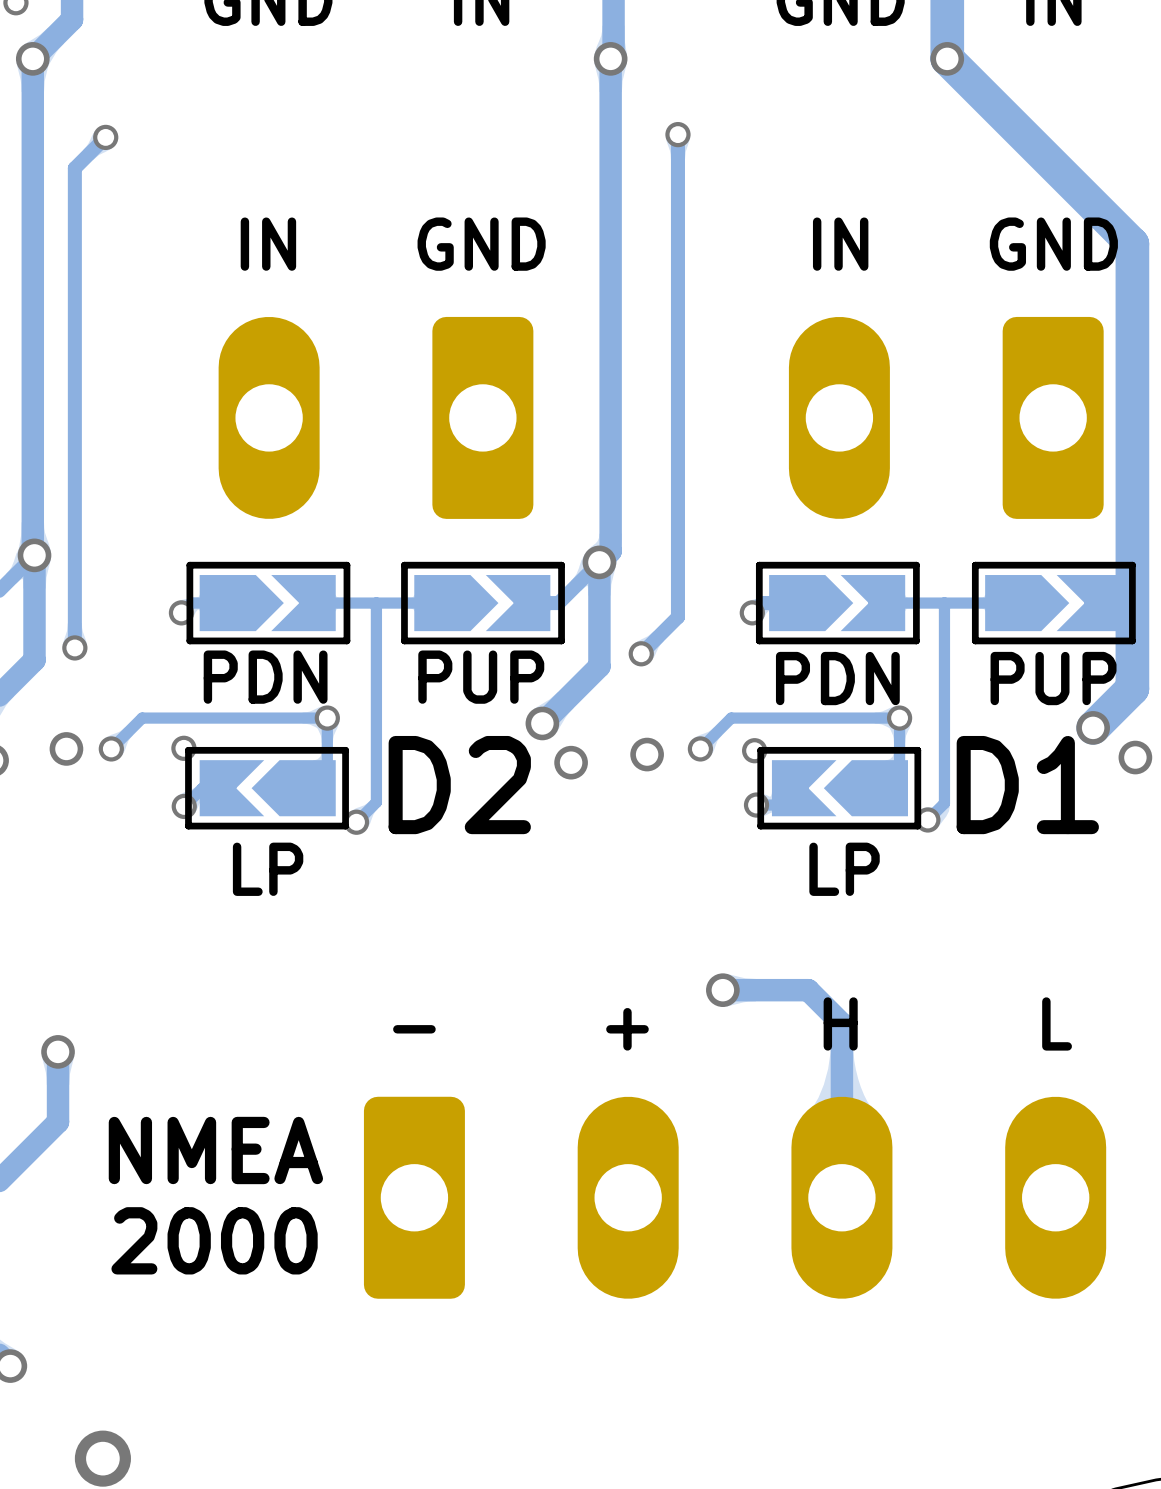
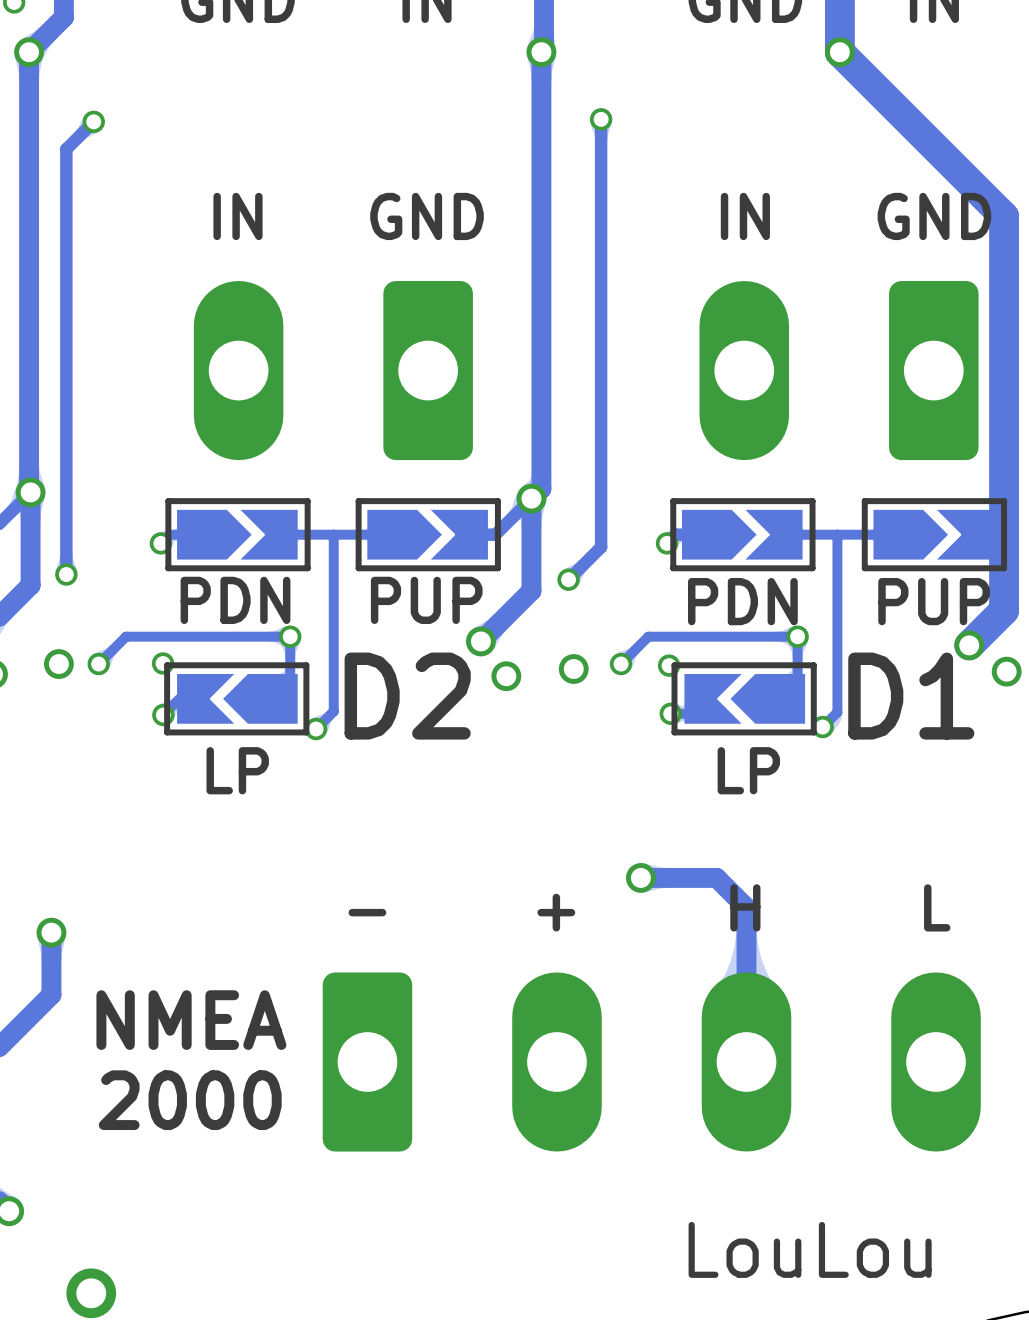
text: none -> LouLou (810, 1249)

